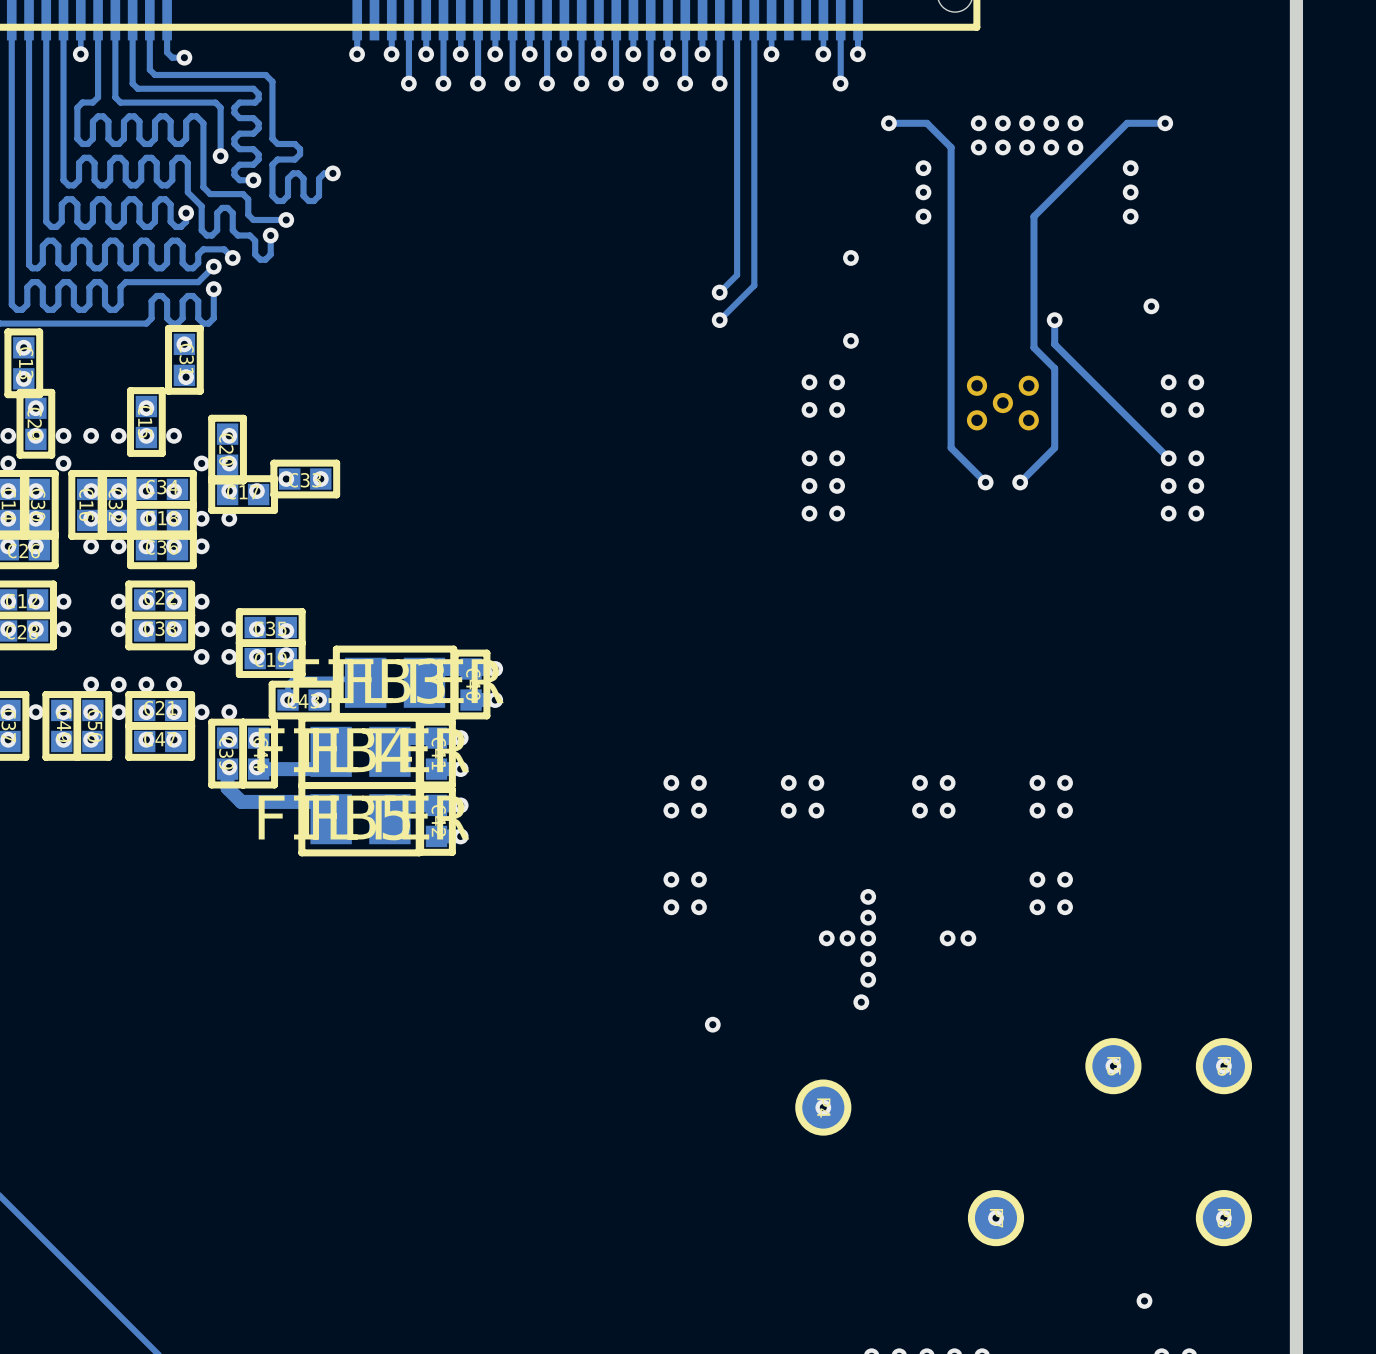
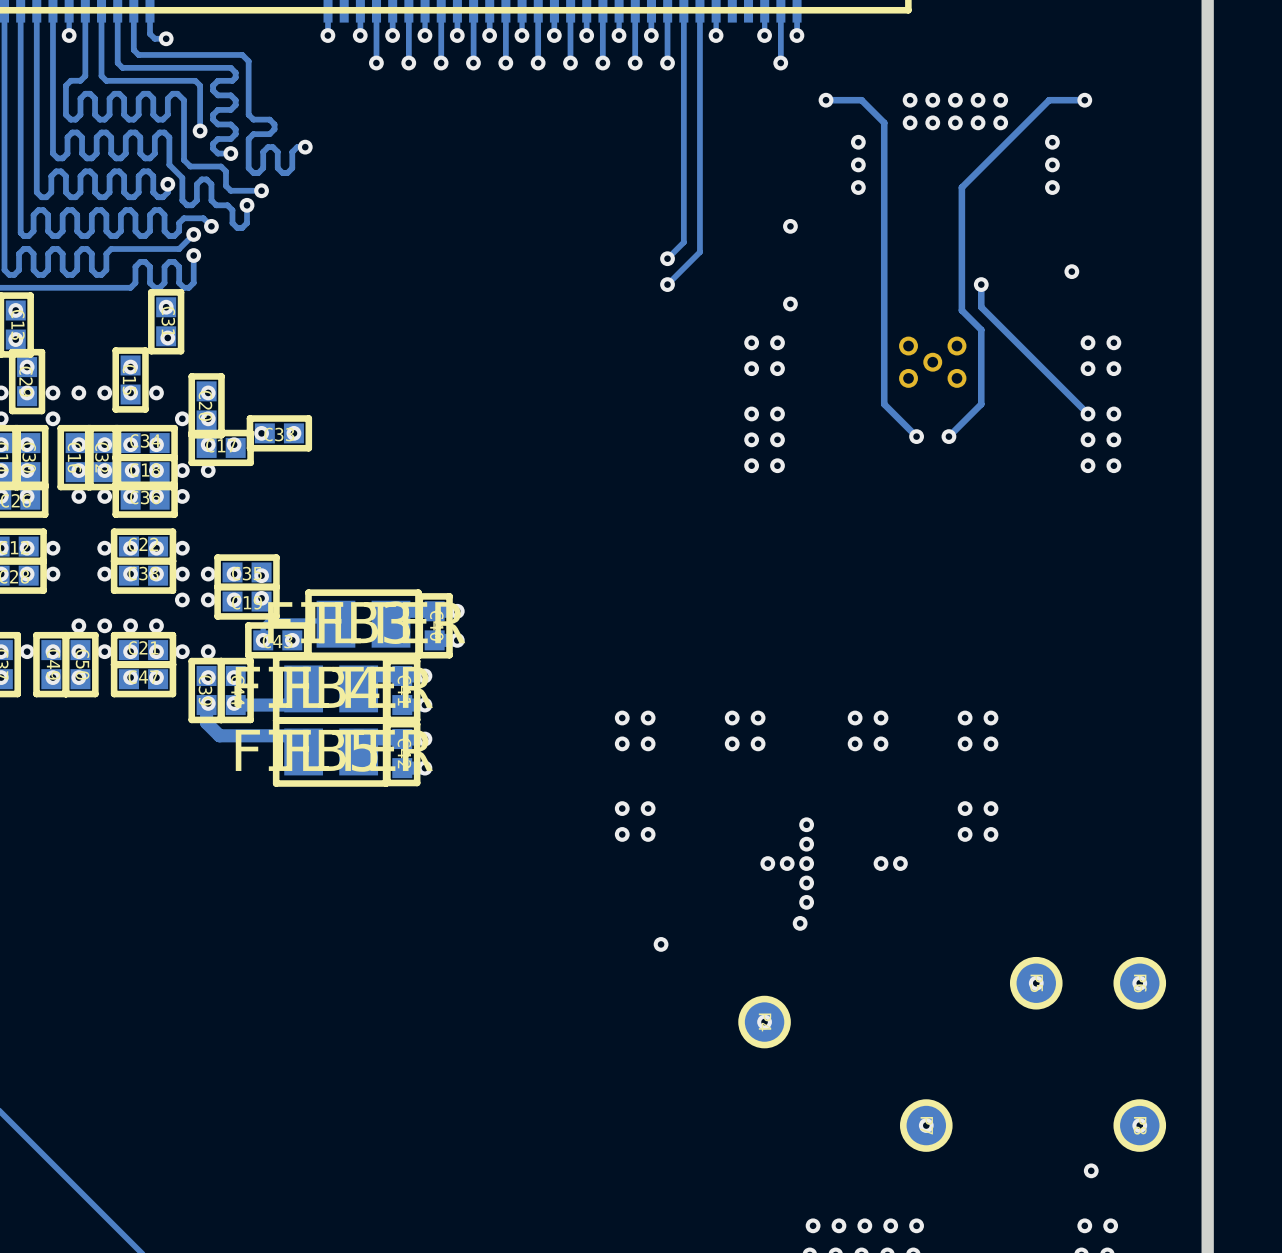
via: none -> (1091, 1170)
via: (1144, 1300) -> none
via: none -> (813, 1225)
via: none -> (838, 1225)
via: none -> (864, 1225)
via: none -> (890, 1225)
via: none -> (916, 1225)
via: none -> (1084, 1225)
via: none -> (1110, 1225)

